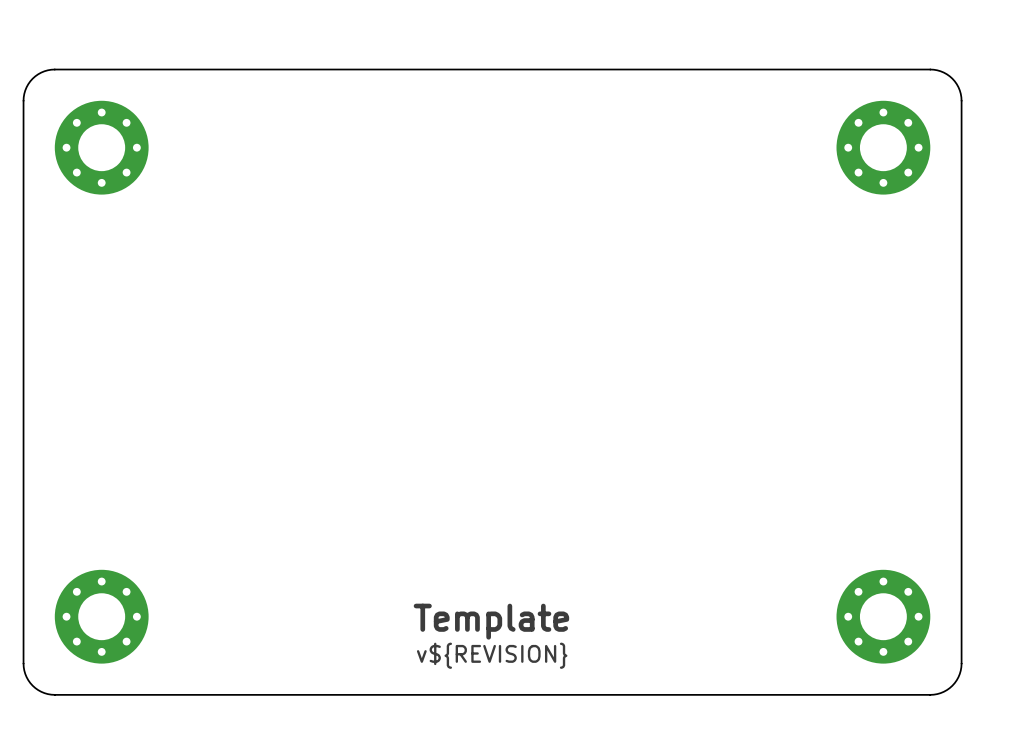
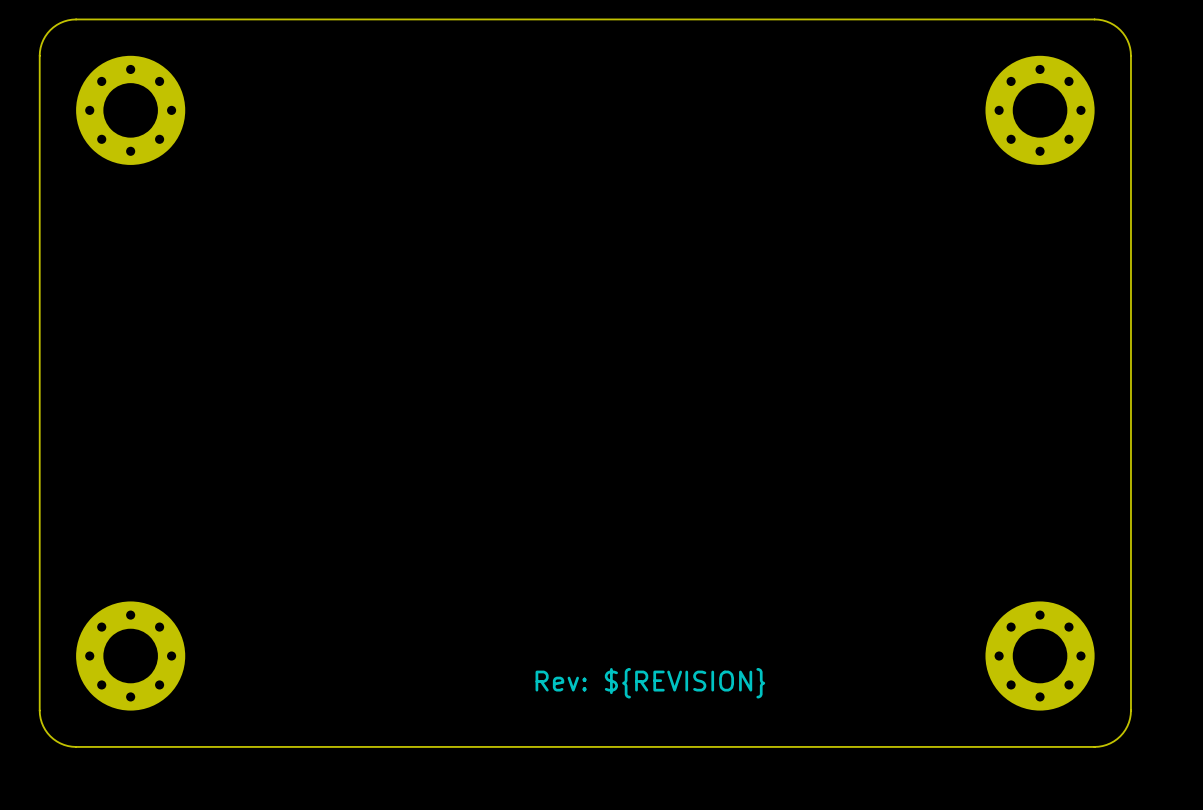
text: Template (491, 621) -> none
text: v${REVISION} (492, 655) -> Rev: ${REVISION} (650, 683)

